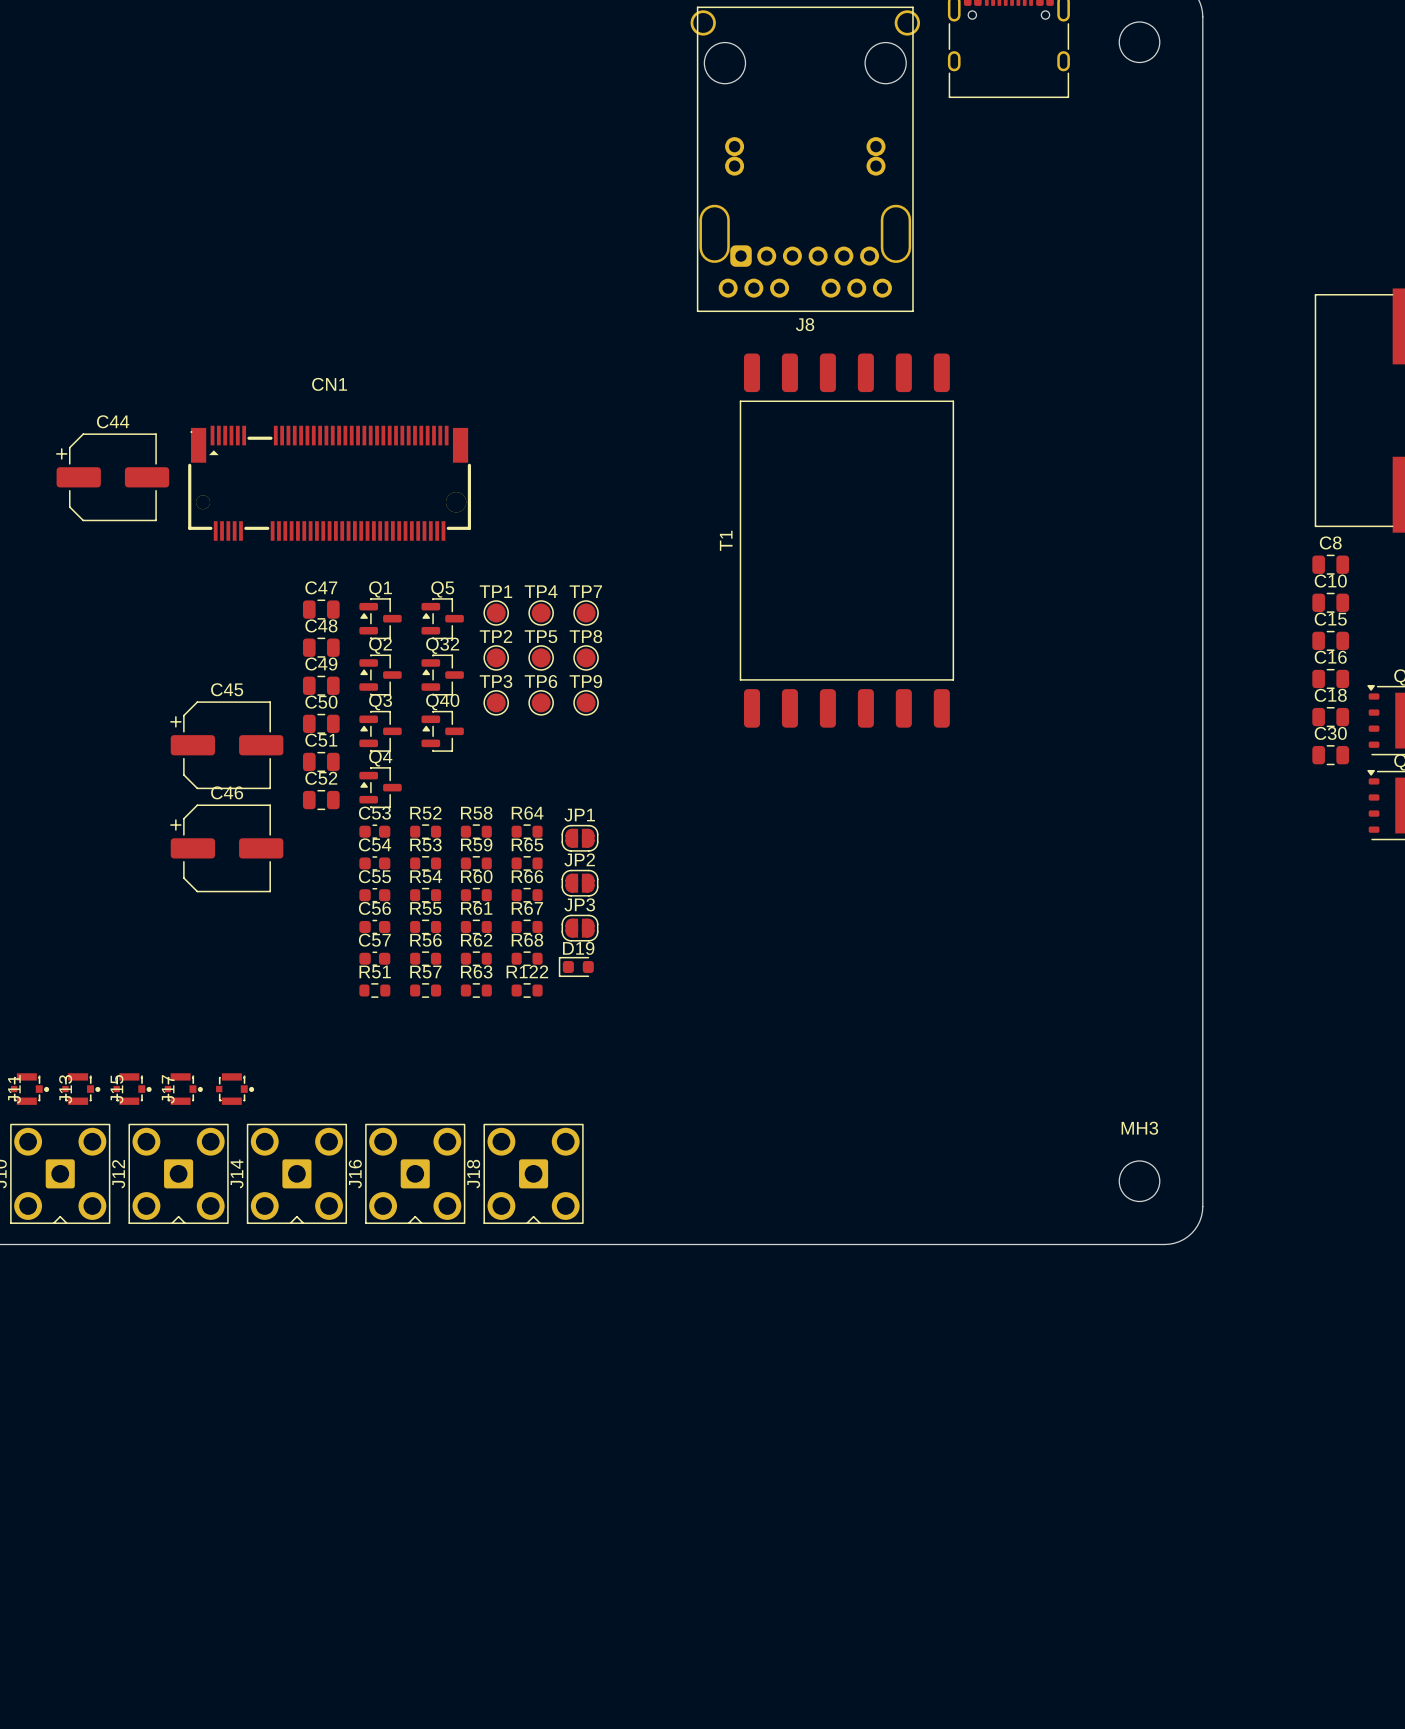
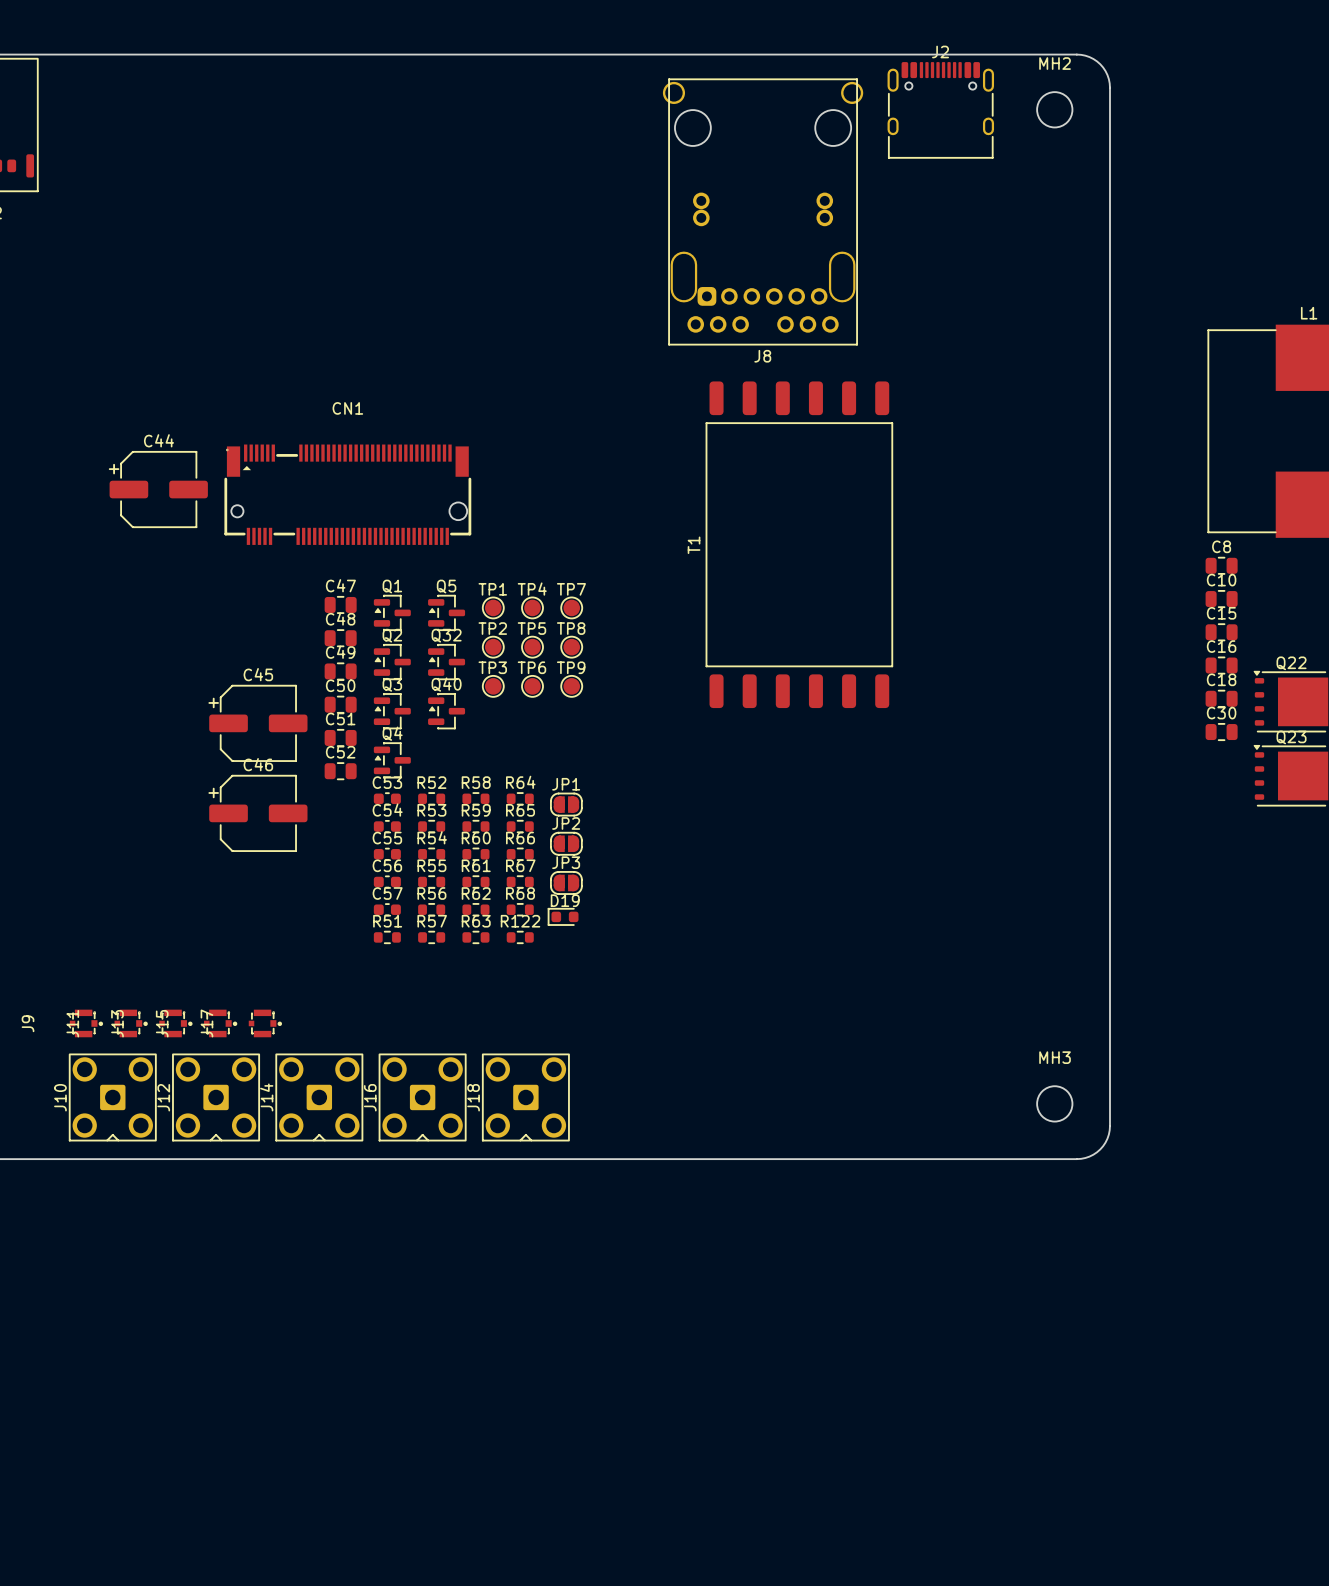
CN1 footprint: [188, 425, 472, 541] -> [224, 444, 472, 545]

